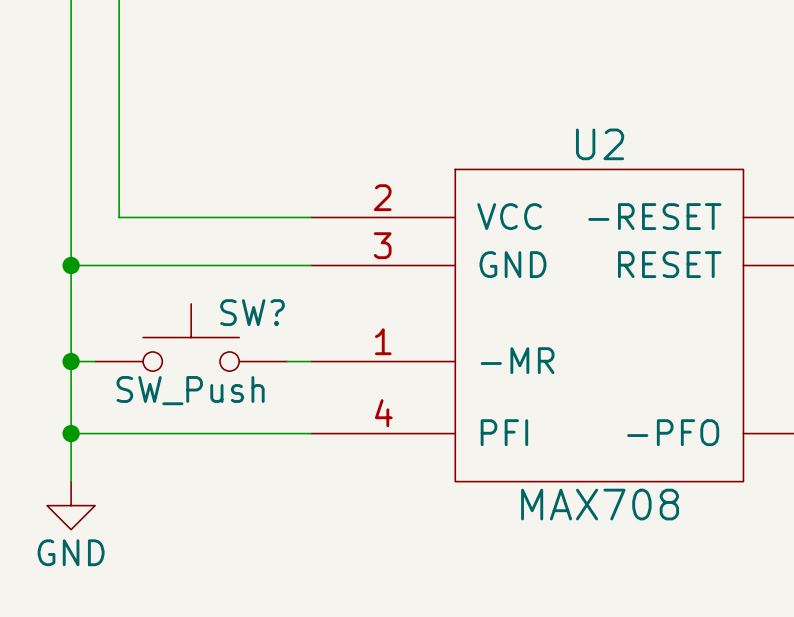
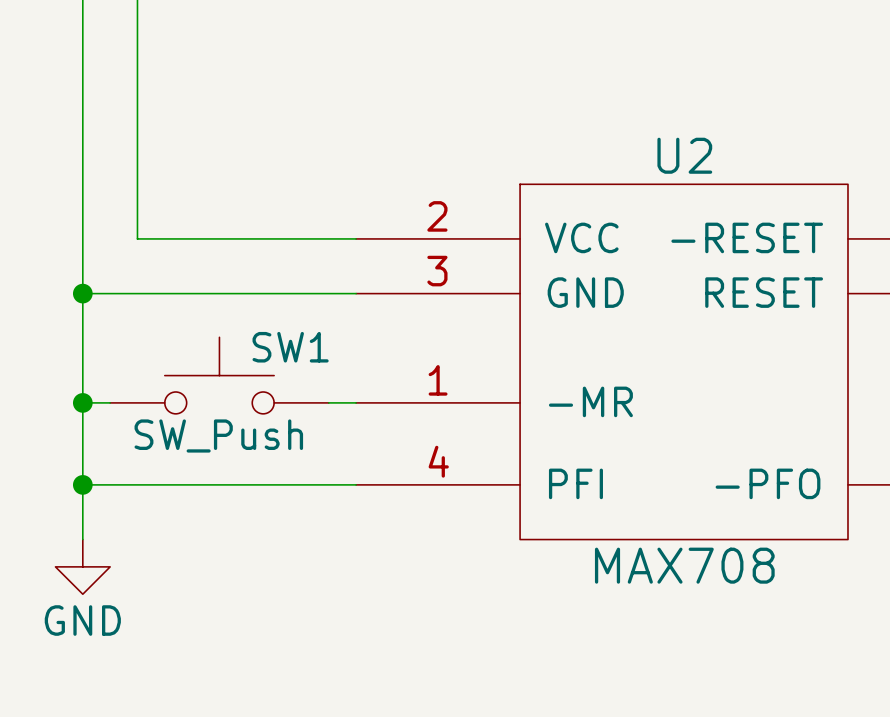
SW? name: SW? (252, 312) -> SW1 (290, 347)

